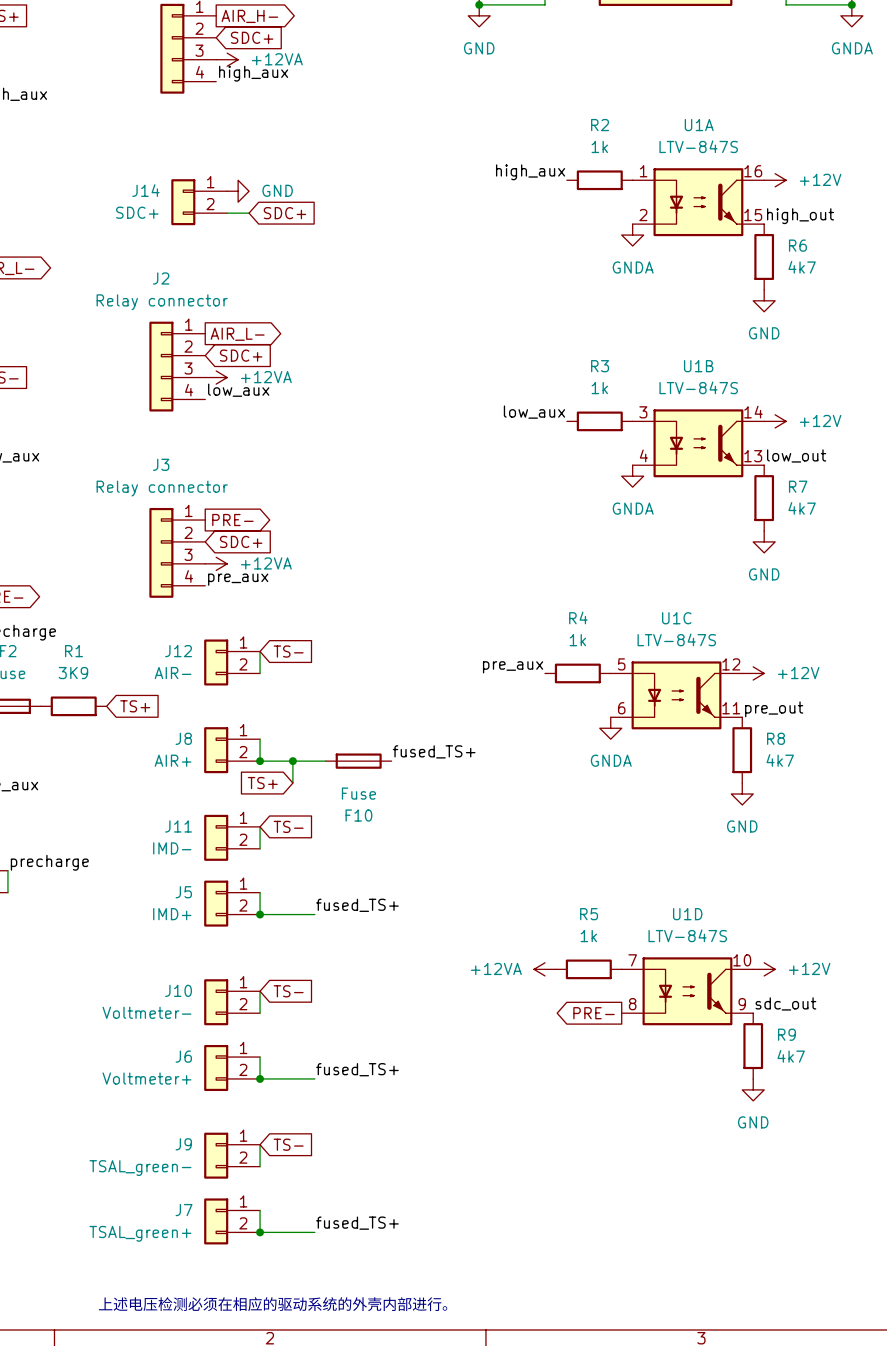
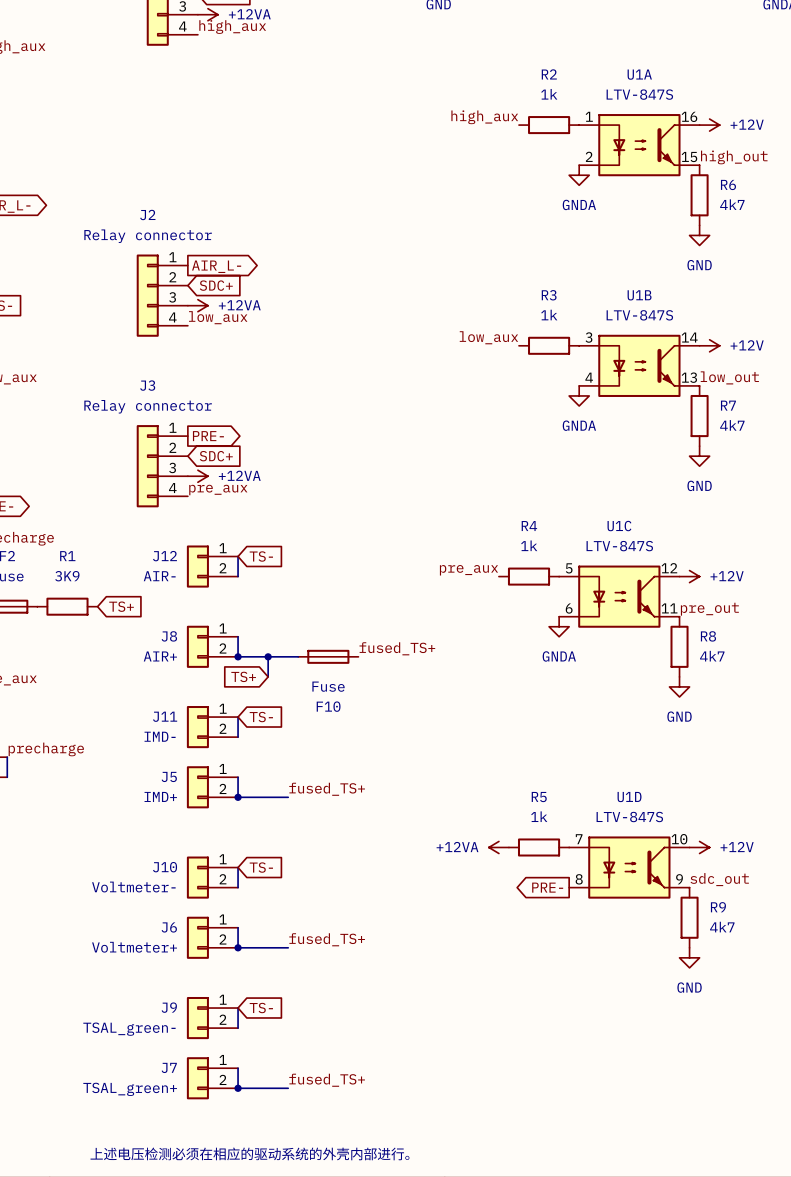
power symbol: GND (238, 191) -> none
J14: SDC+ (199, 202) -> none
wire: (227, 213) (249, 213) -> none
global label: SDC+ (284, 213) -> none

